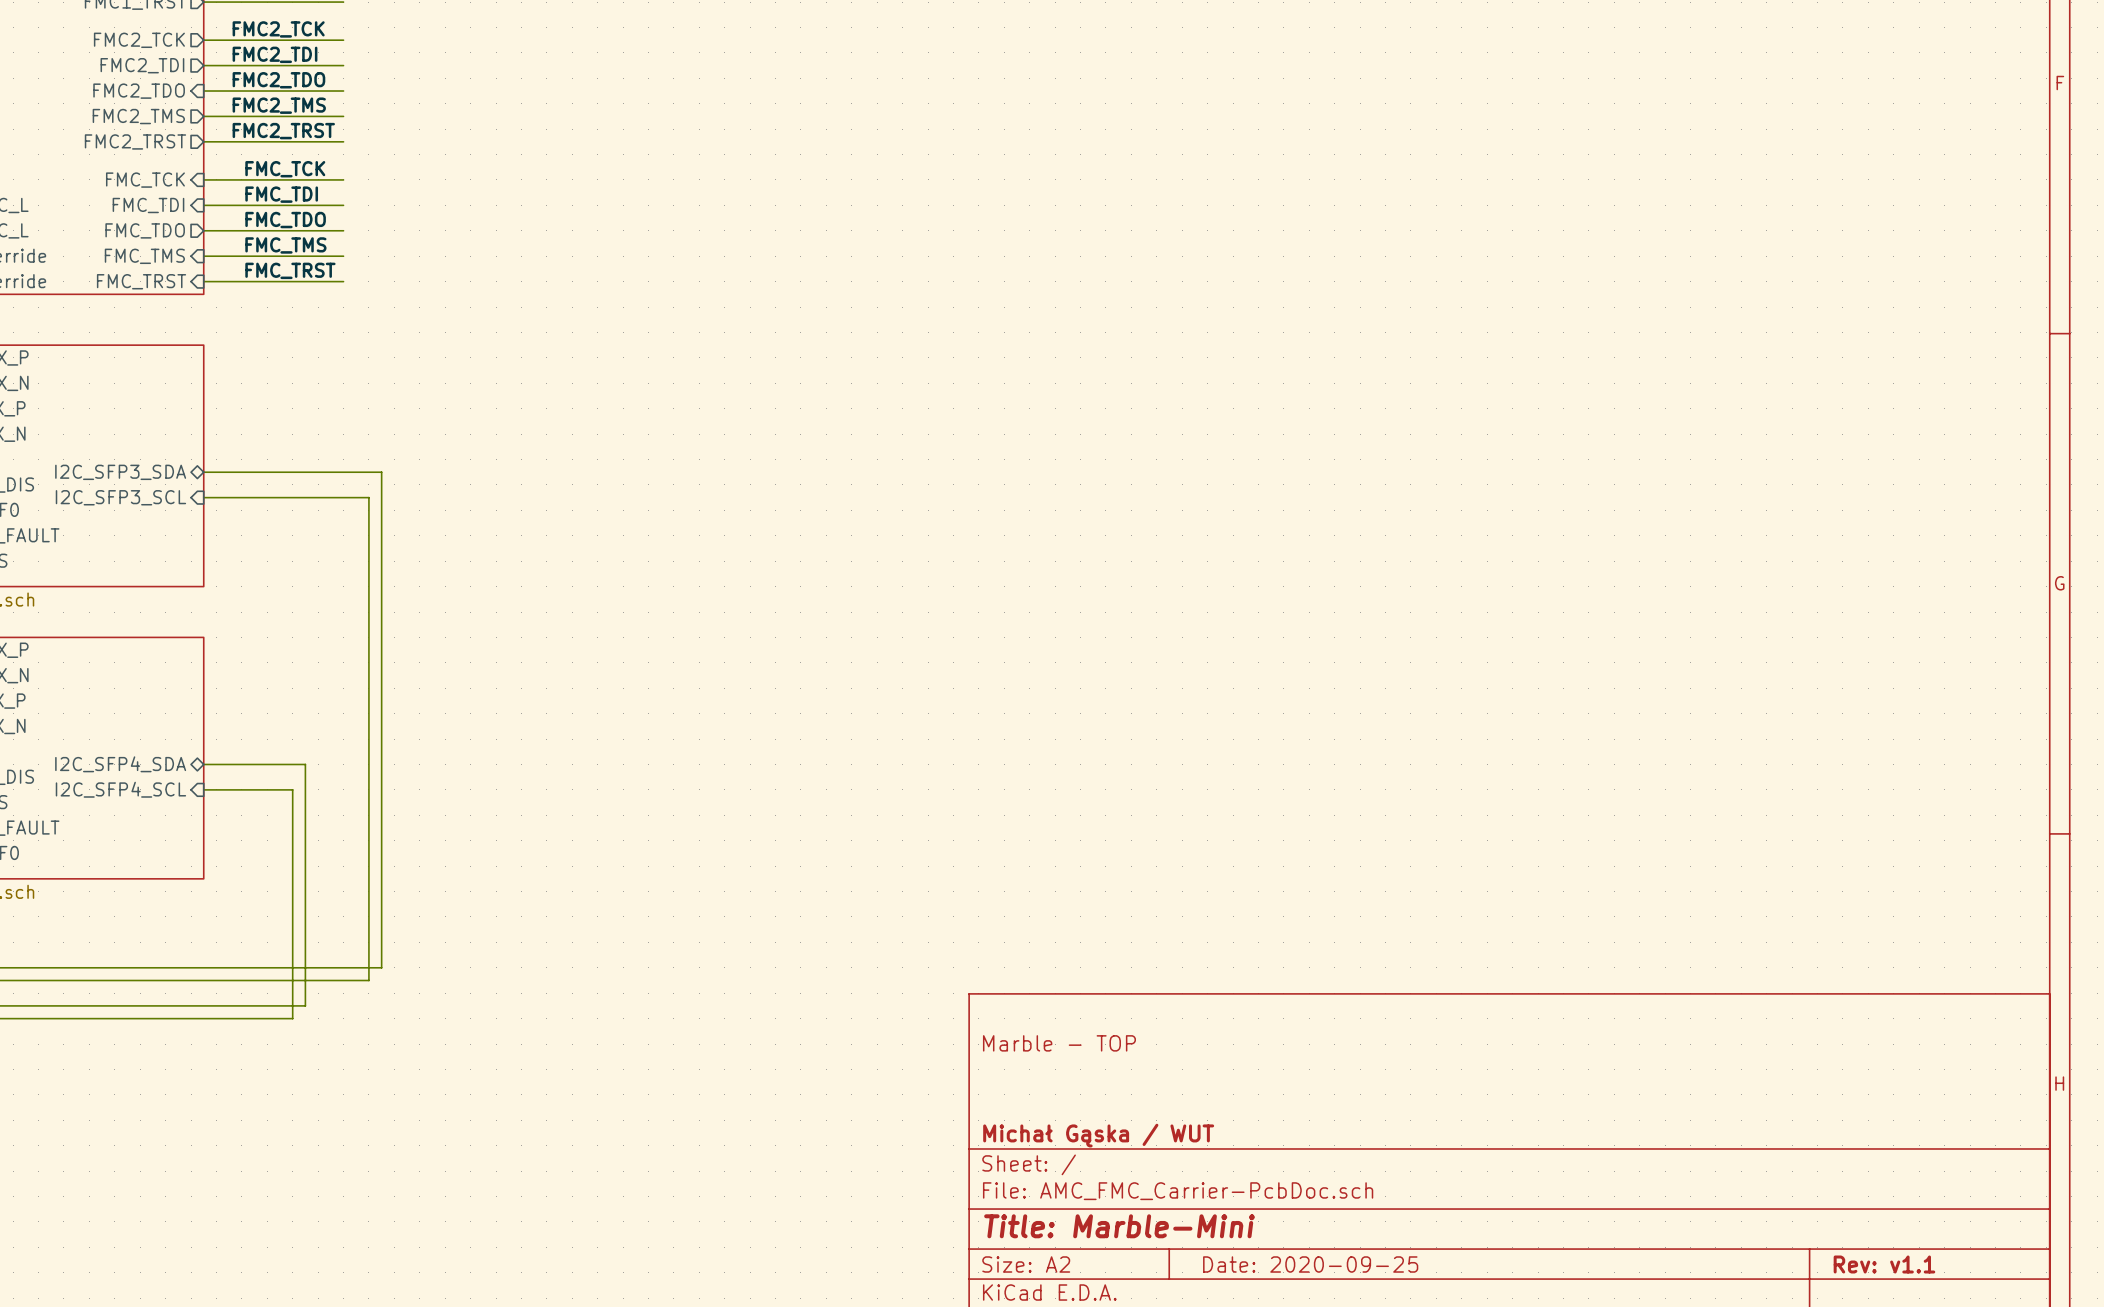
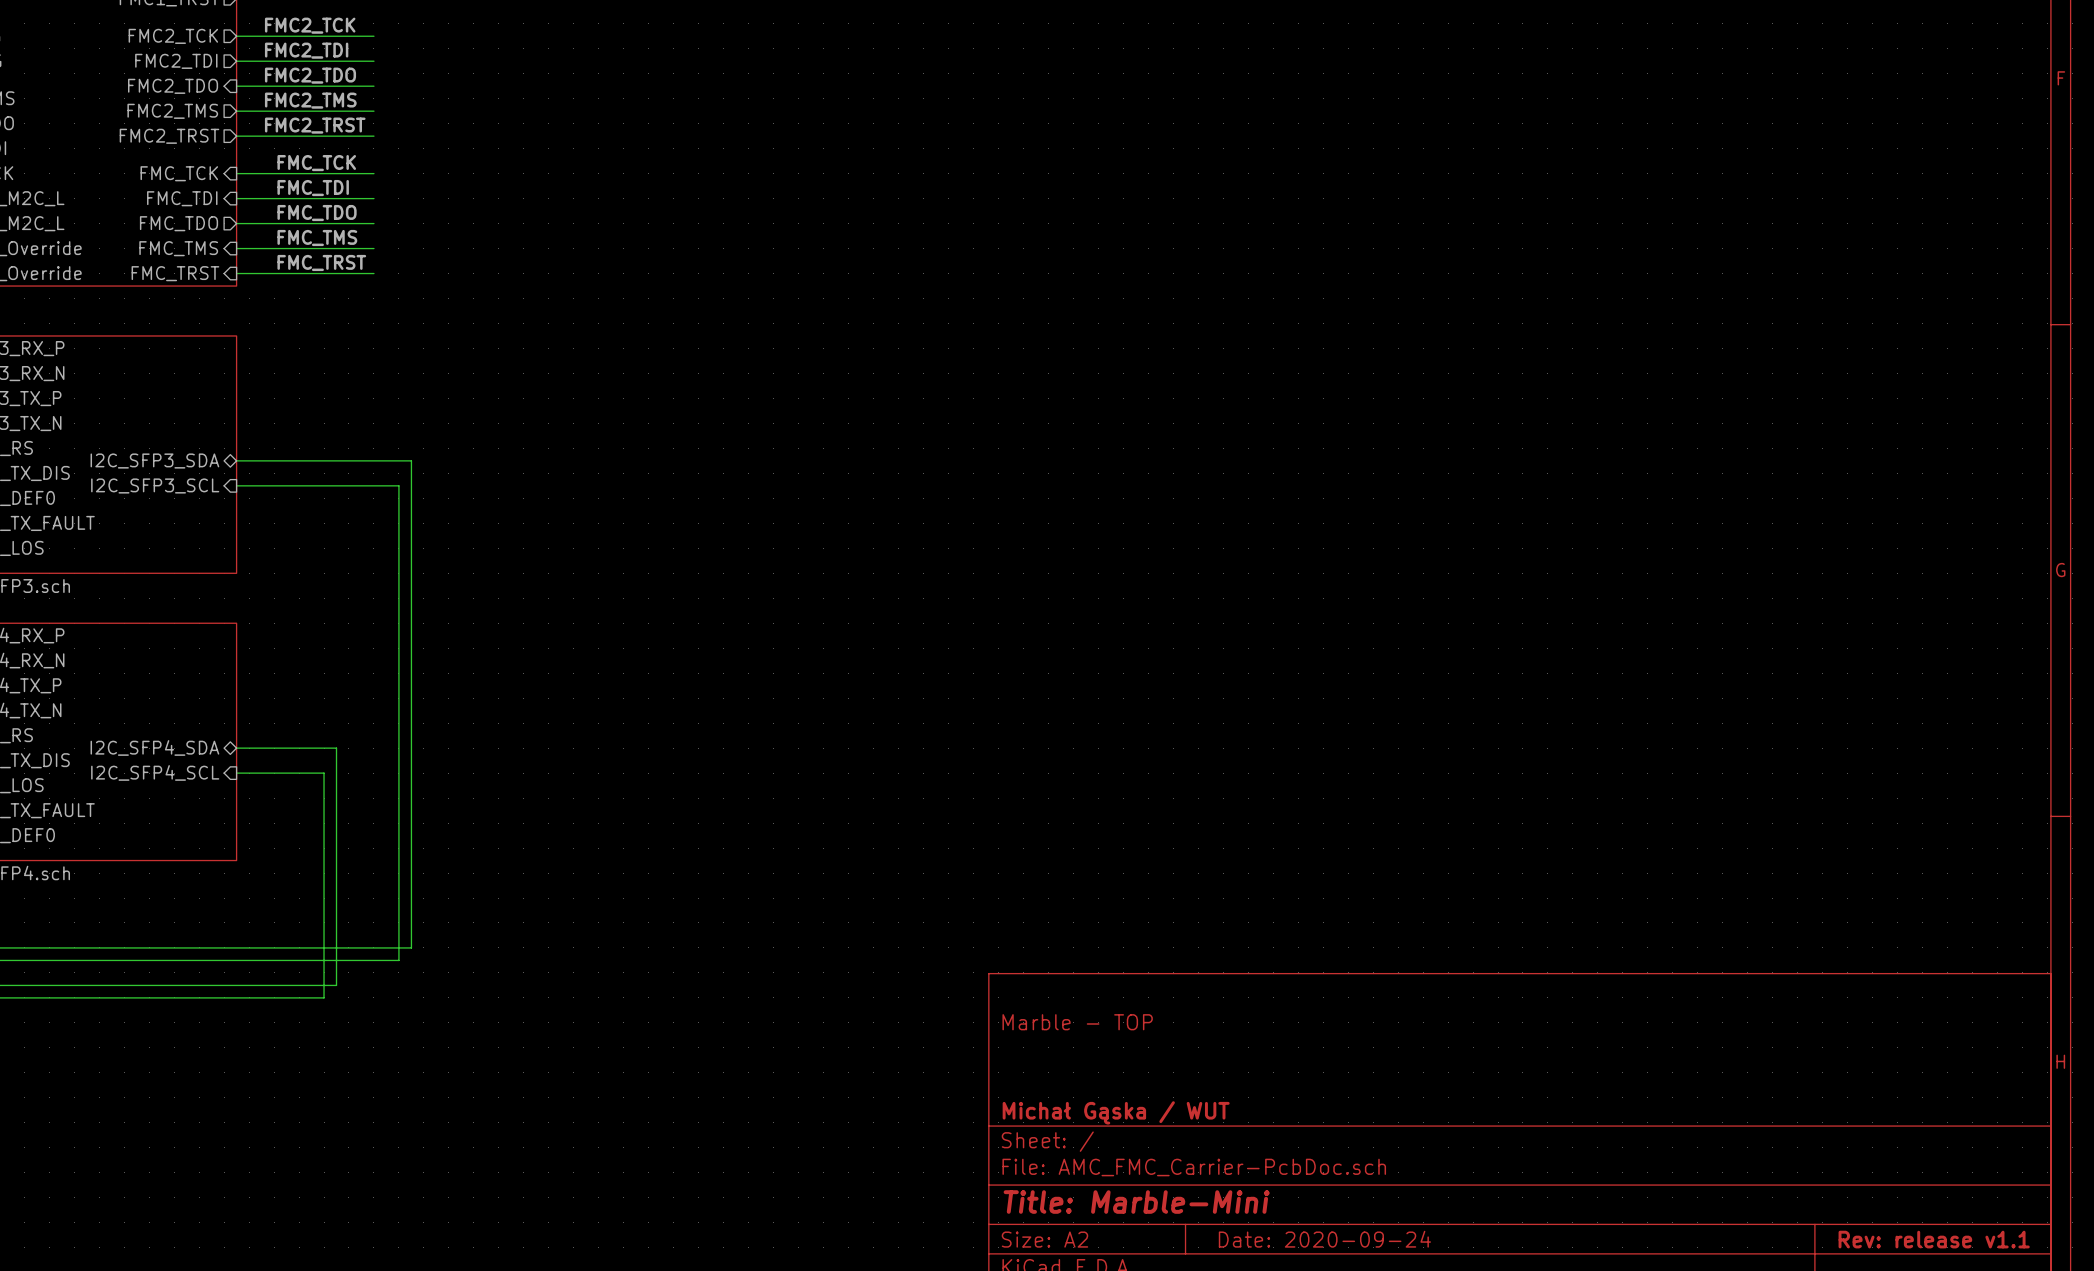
title block: Date: 2020-09-25 (1310, 1264) -> Date: 2020-09-24 (1324, 1239)
title block: Rev: v1.1 (1884, 1264) -> Rev: release v1.1 (1934, 1239)

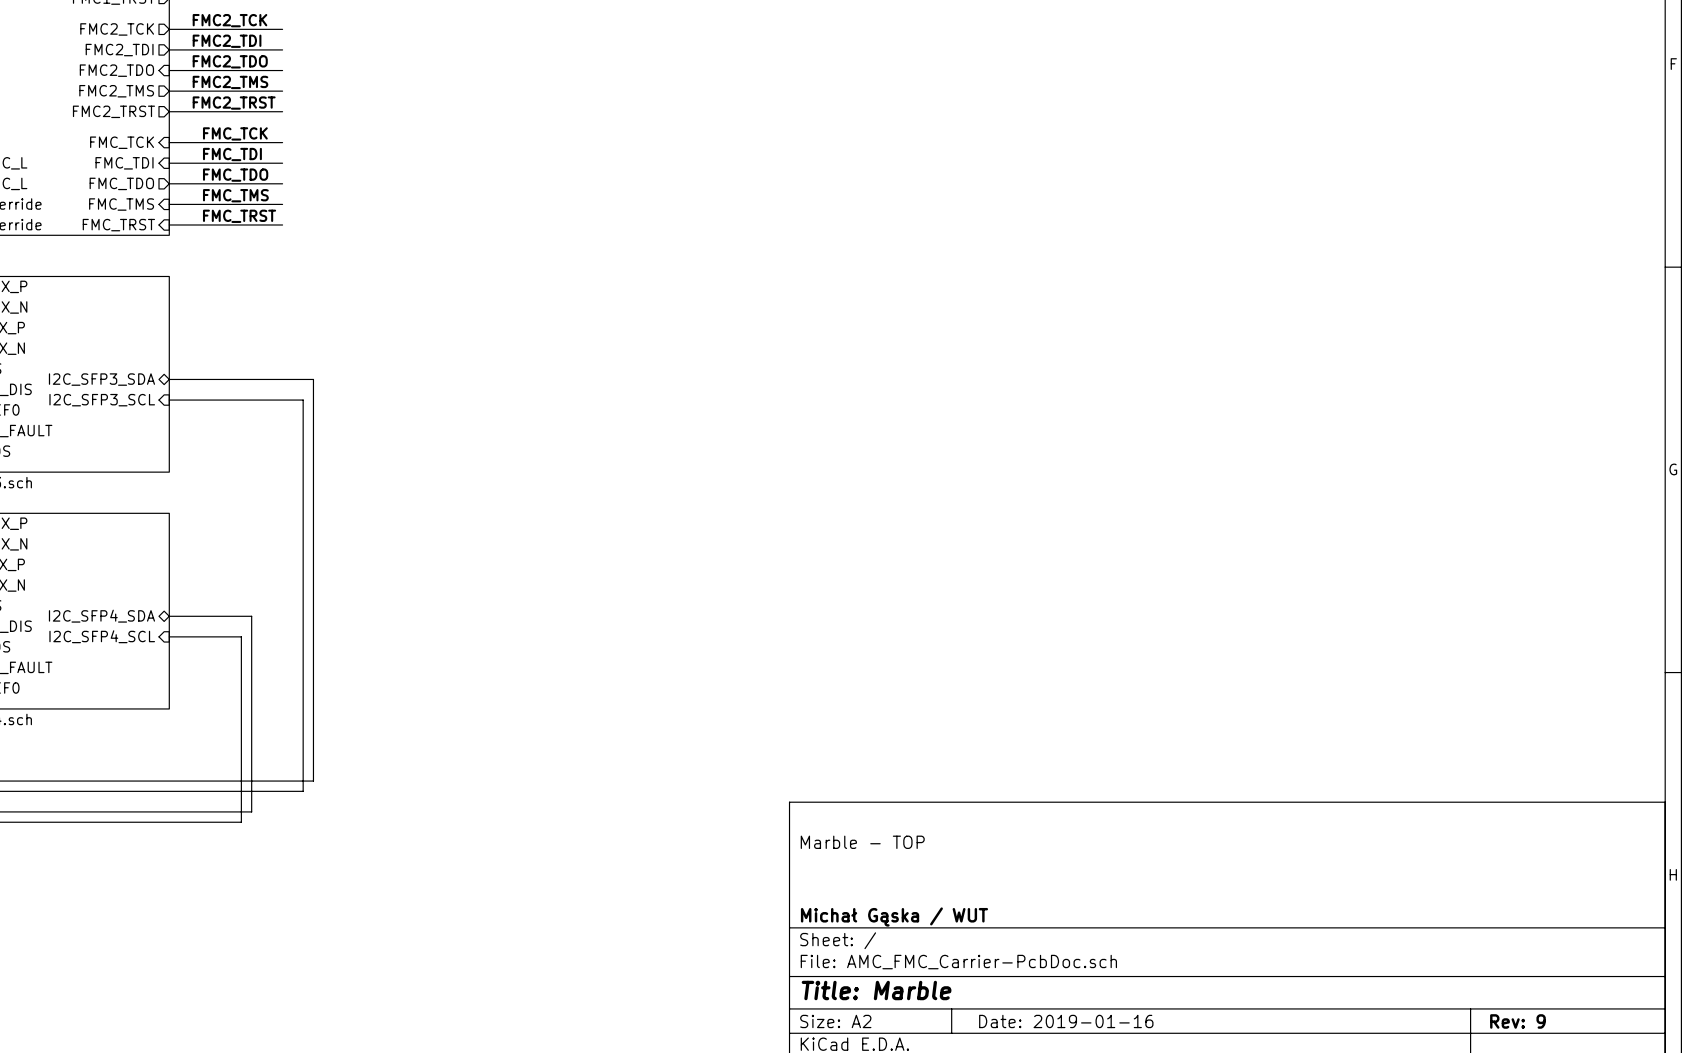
title block: Title: Marble-Mini (1136, 1202) -> Title: Marble (876, 990)
title block: Date: 2020-09-24 (1324, 1239) -> Date: 2019-01-16 (1066, 1021)
title block: Rev: release v1.1 (1934, 1239) -> Rev: 9 (1517, 1021)

